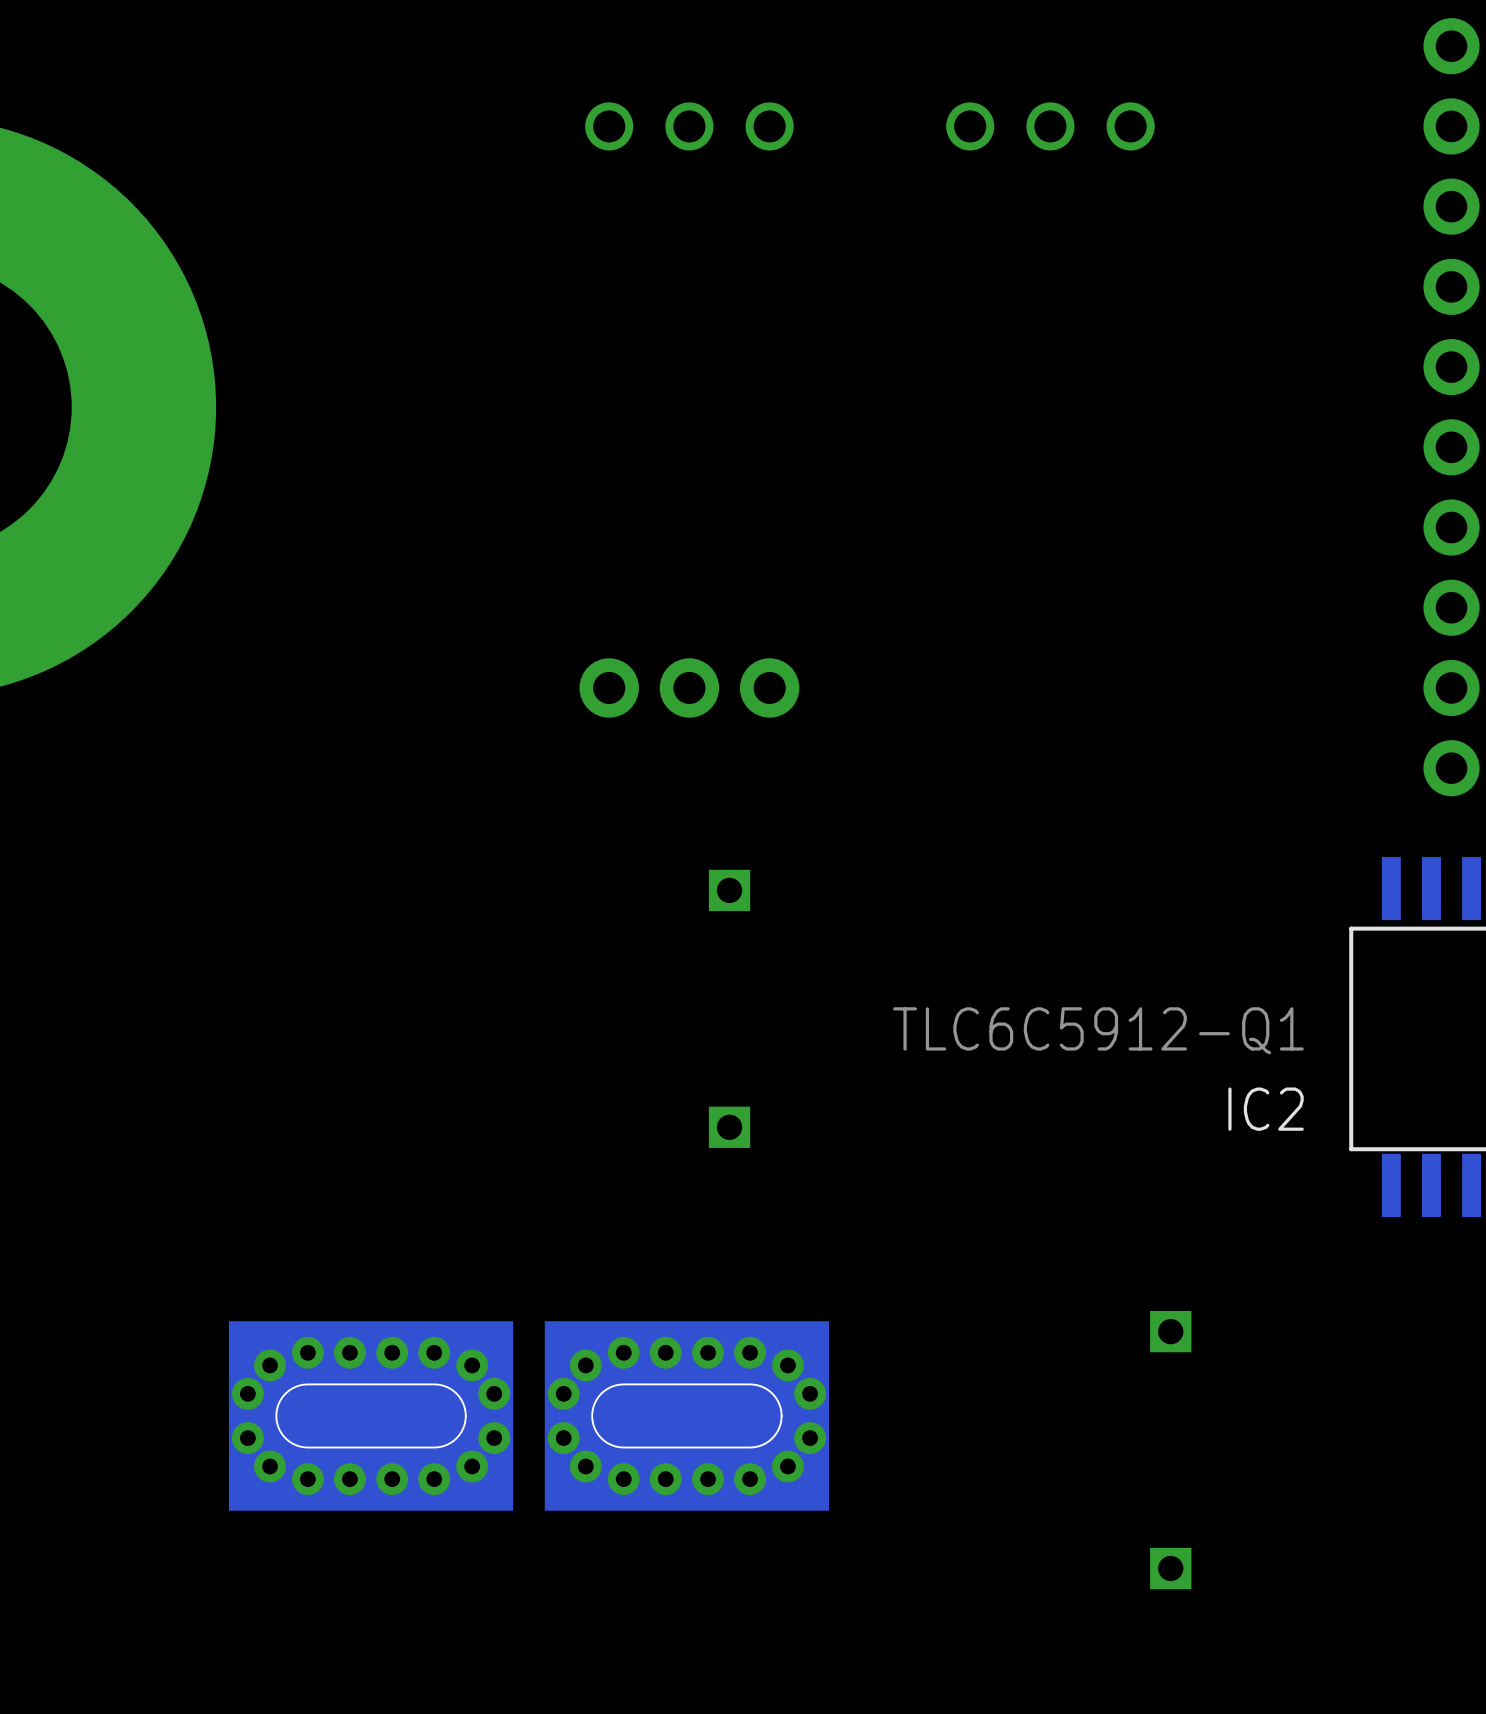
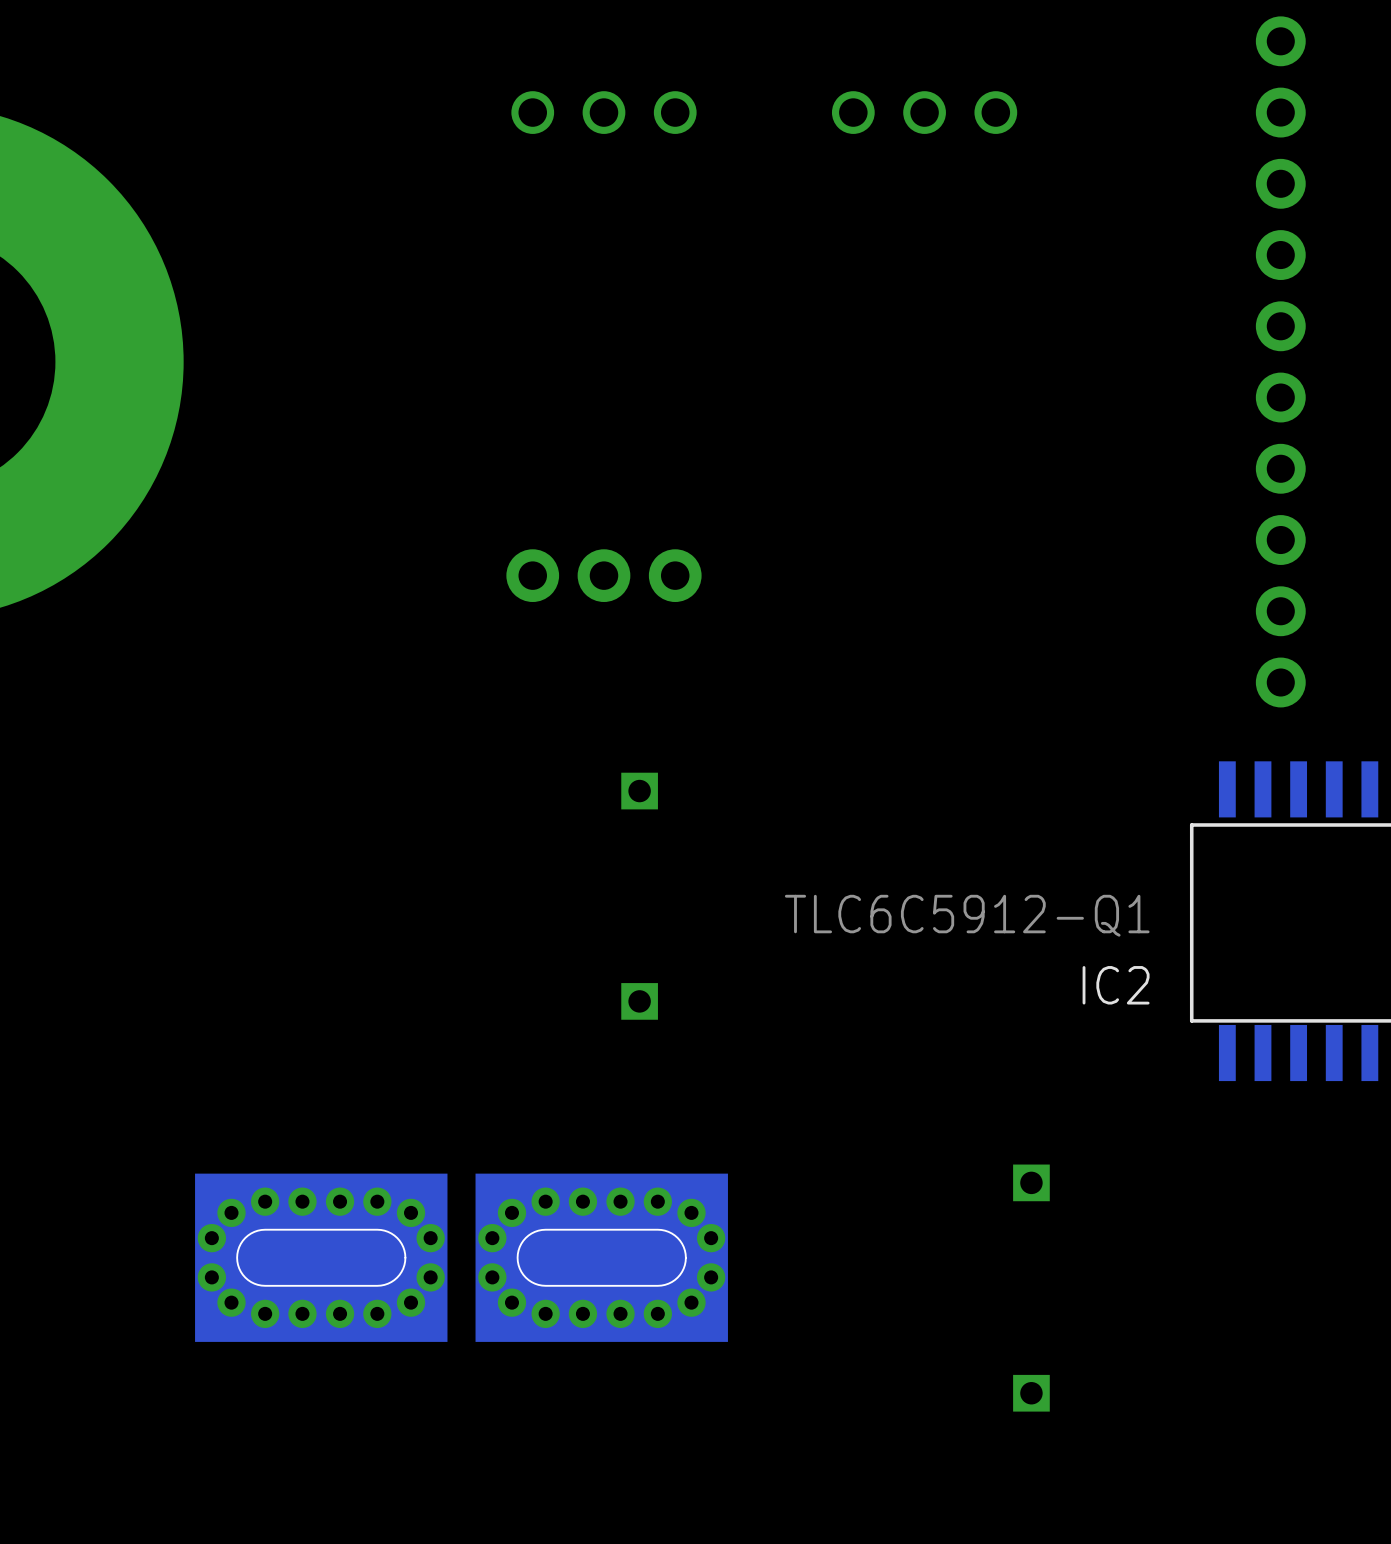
part position: (689, 687) -> (603, 575)

